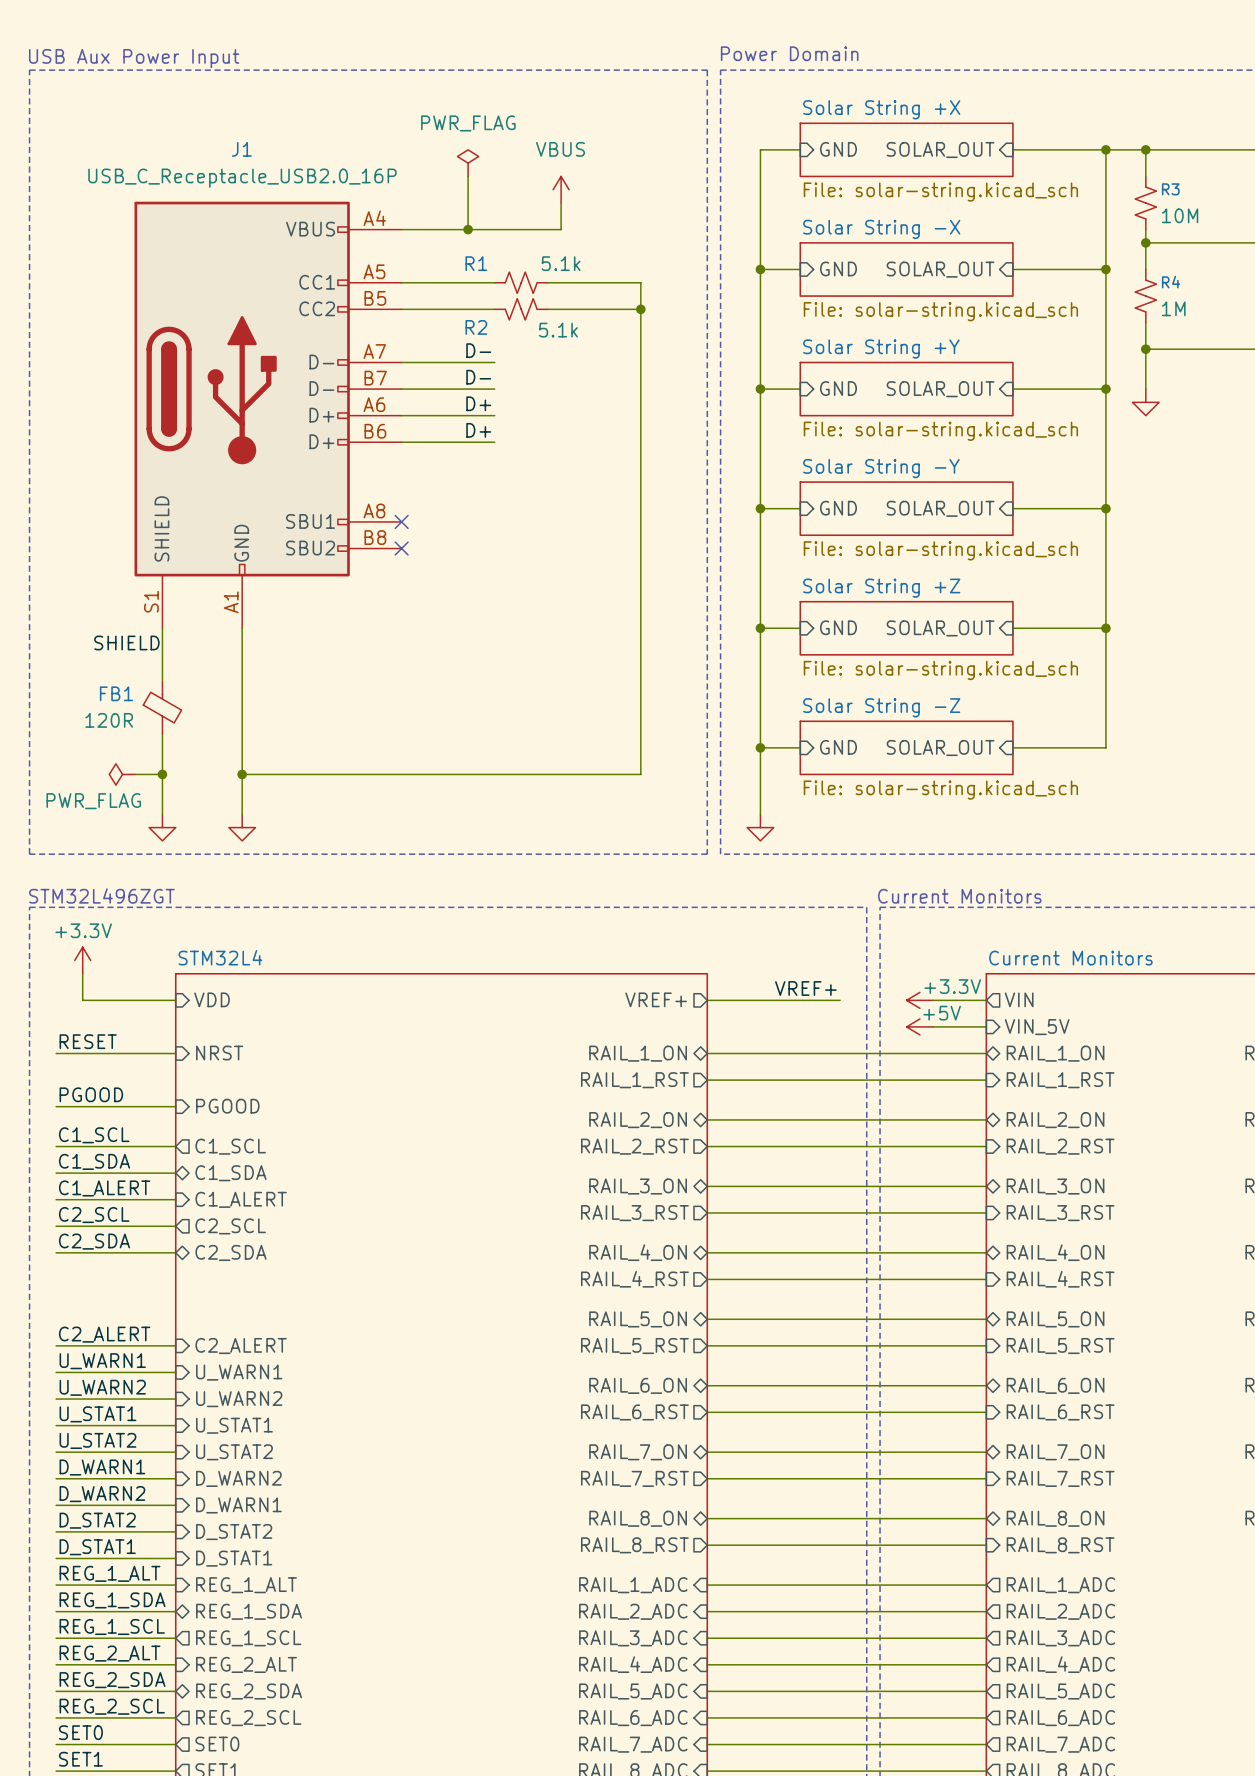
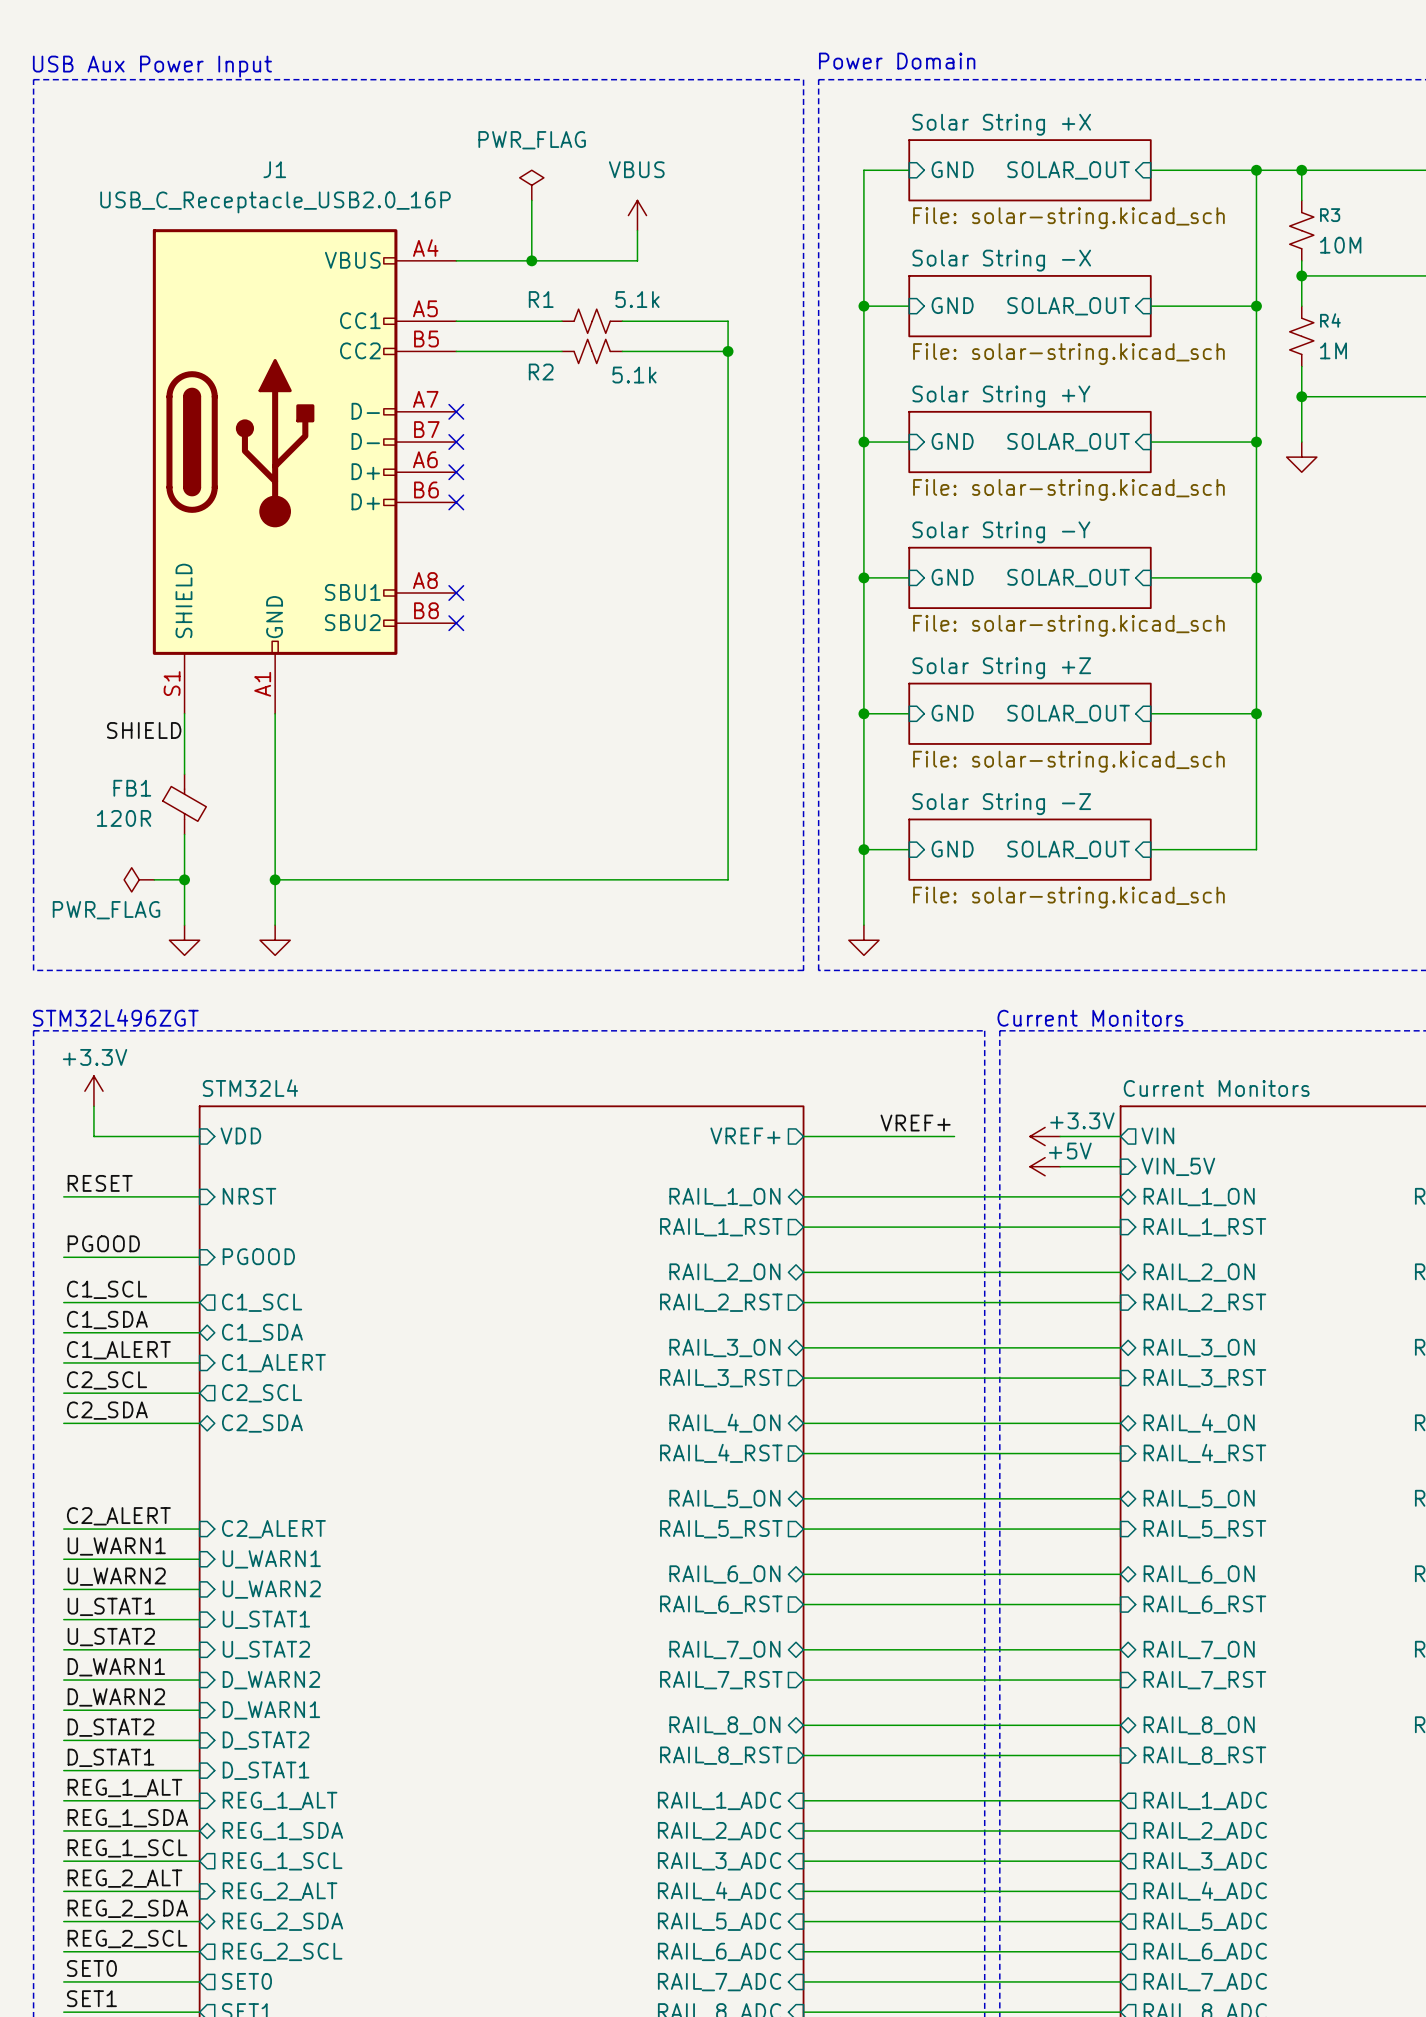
label: D- (478, 350) -> none
wire: (401, 362) (494, 362) -> none
no-connect mark: none -> (456, 411)
label: D- (478, 377) -> none
wire: (401, 389) (494, 389) -> none
no-connect mark: none -> (456, 442)
label: D+ (478, 403) -> none
wire: (401, 415) (494, 415) -> none
no-connect mark: none -> (456, 472)
label: D+ (478, 430) -> none
wire: (401, 442) (494, 442) -> none
no-connect mark: none -> (456, 502)

